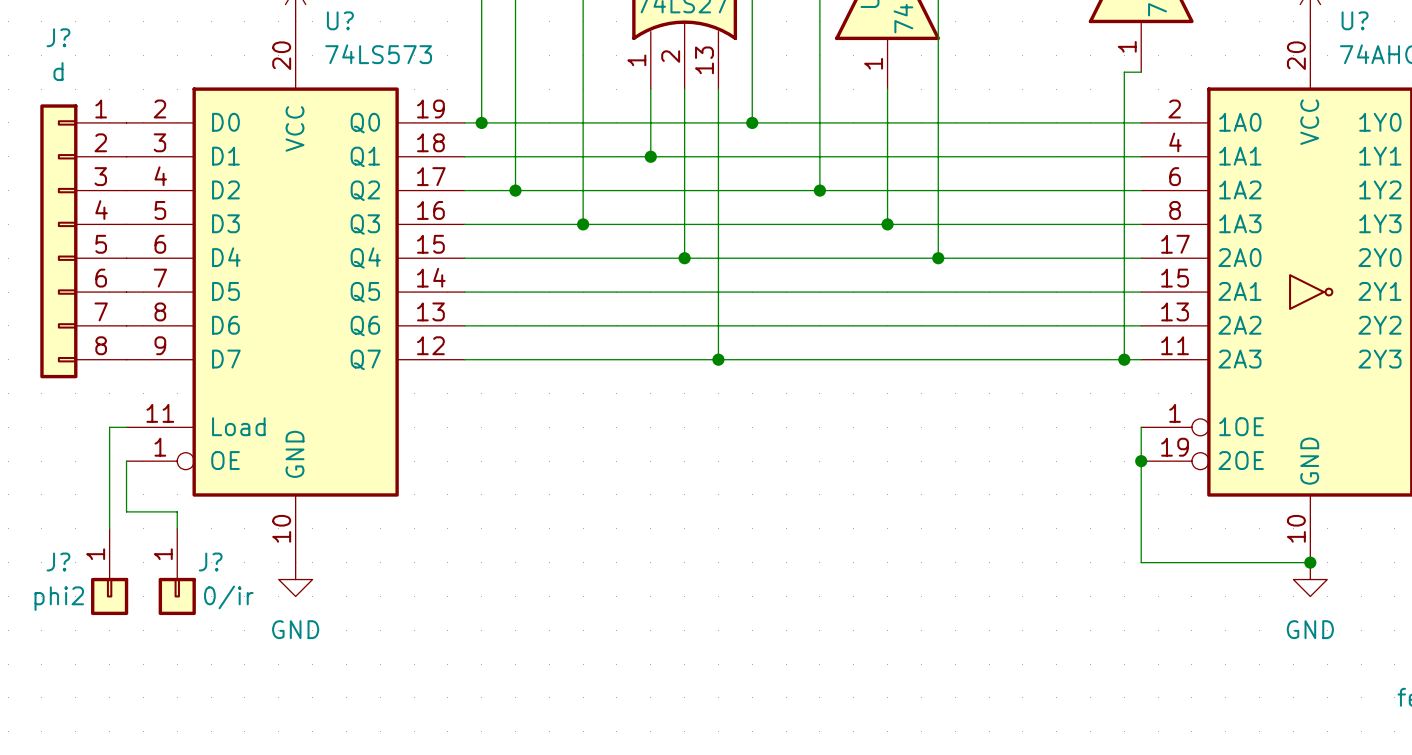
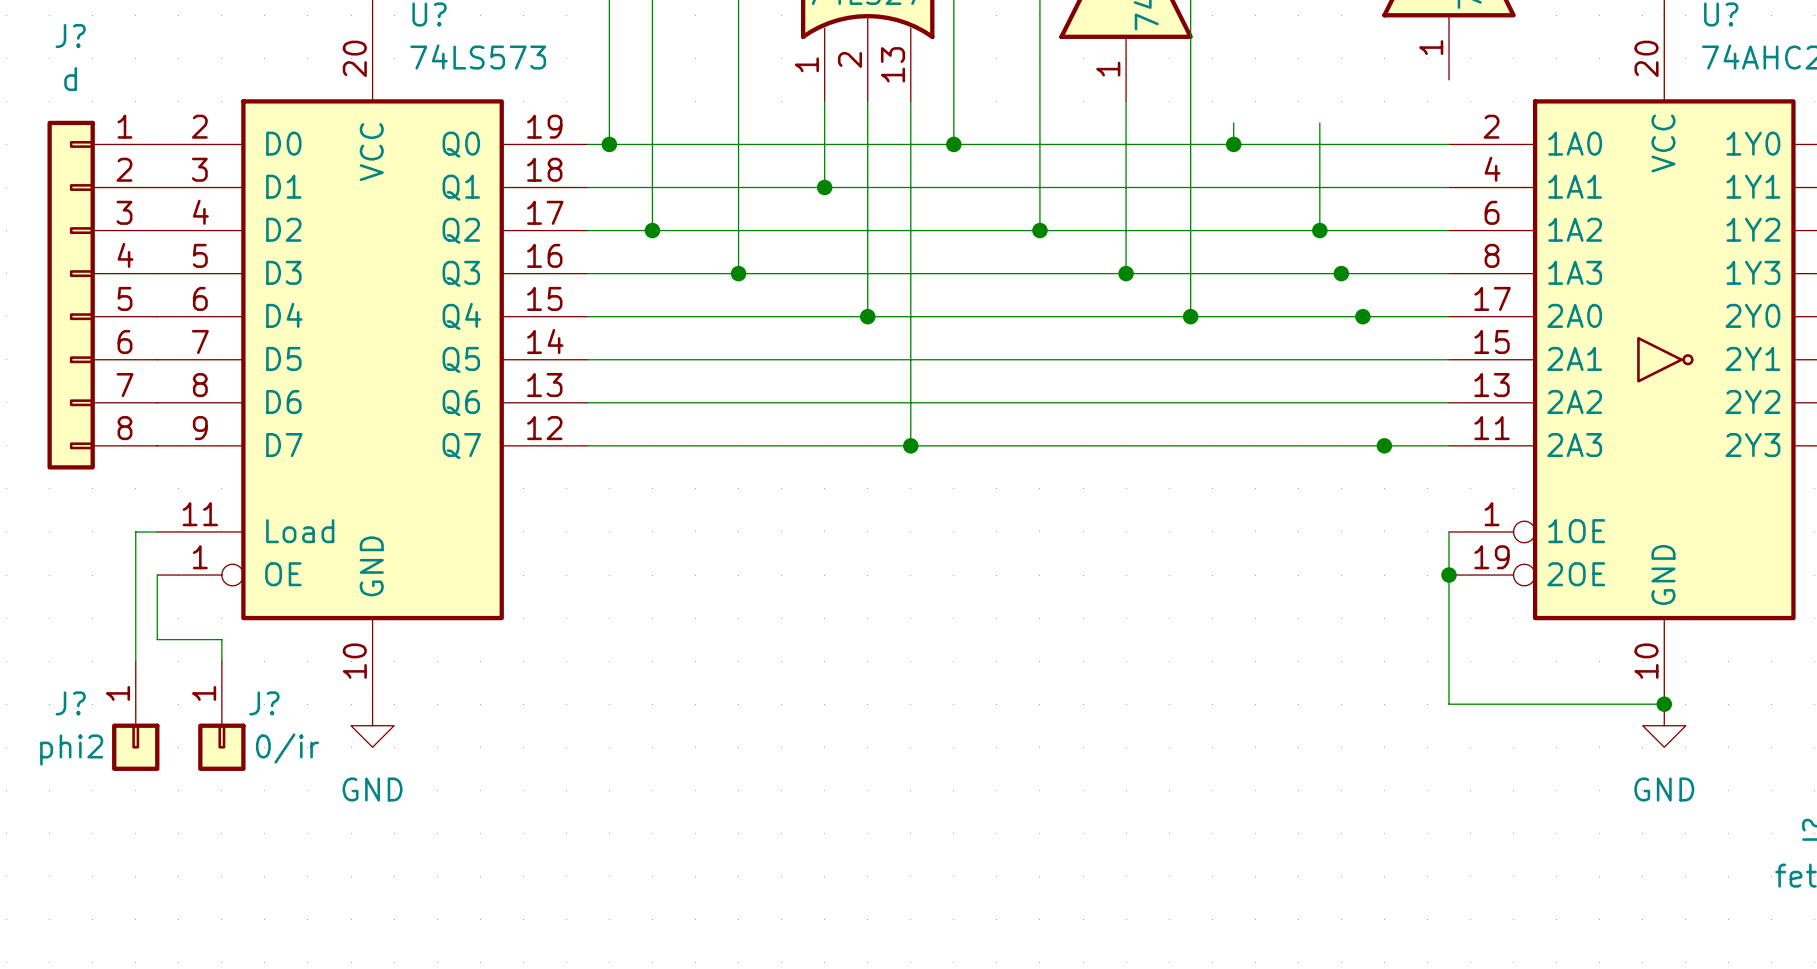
wire: (1141, 72) (1124, 72) (1124, 359) -> none
wire: none -> (1233, 122) (1233, 144)
wire: none -> (1319, 122) (1319, 230)
junction: none -> (1233, 144)
junction: none -> (1319, 230)
junction: none -> (1341, 273)
junction: none -> (1362, 316)
junction position: (1124, 359) -> (1384, 445)

